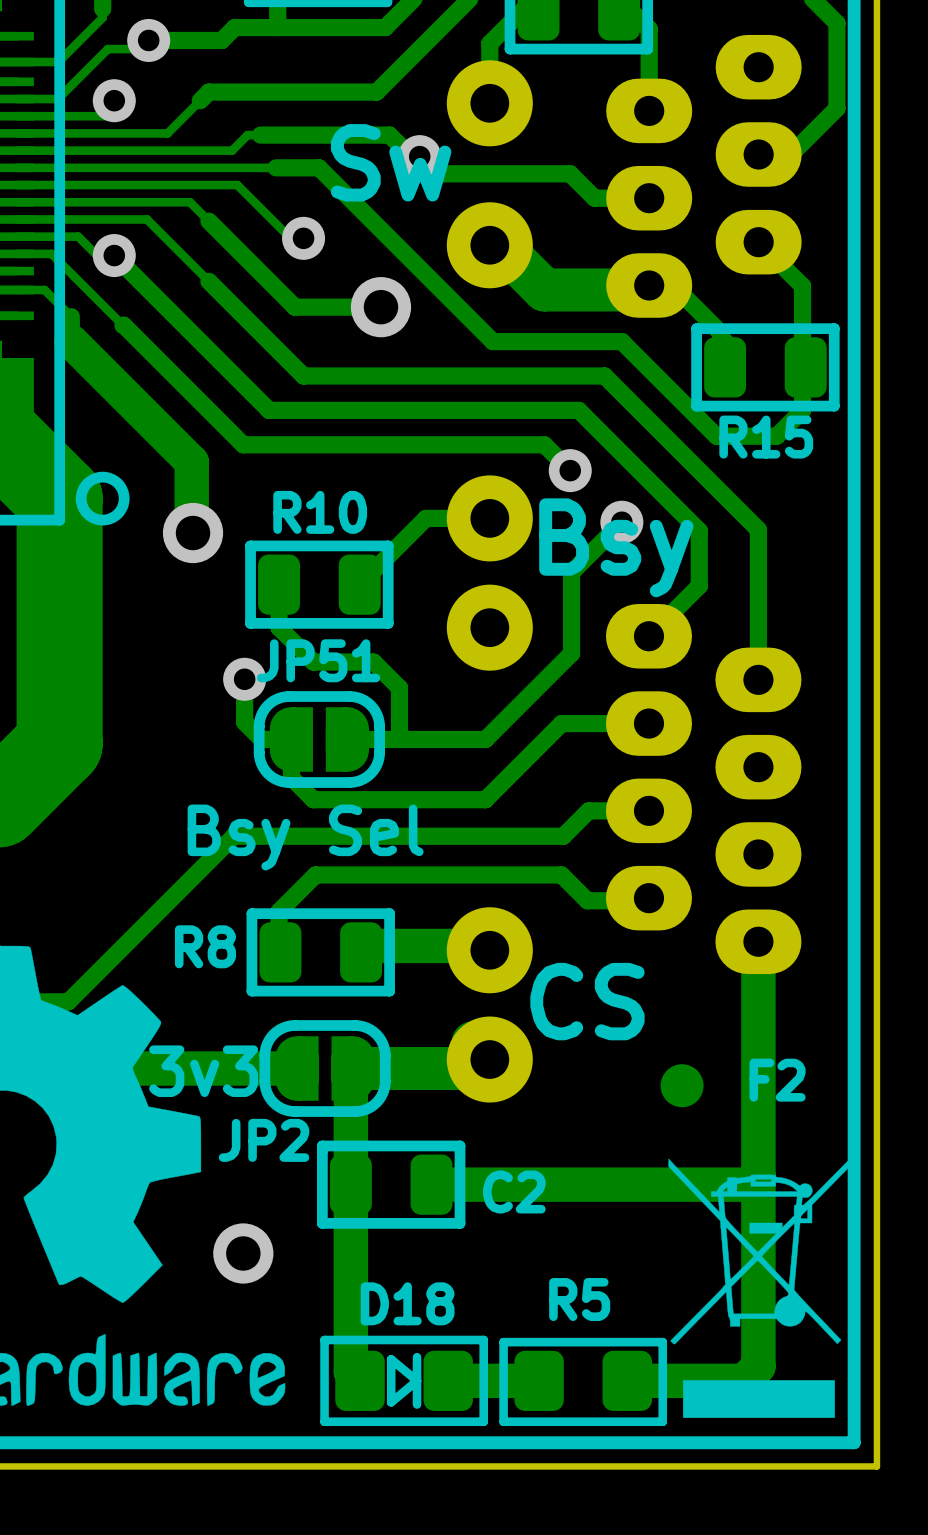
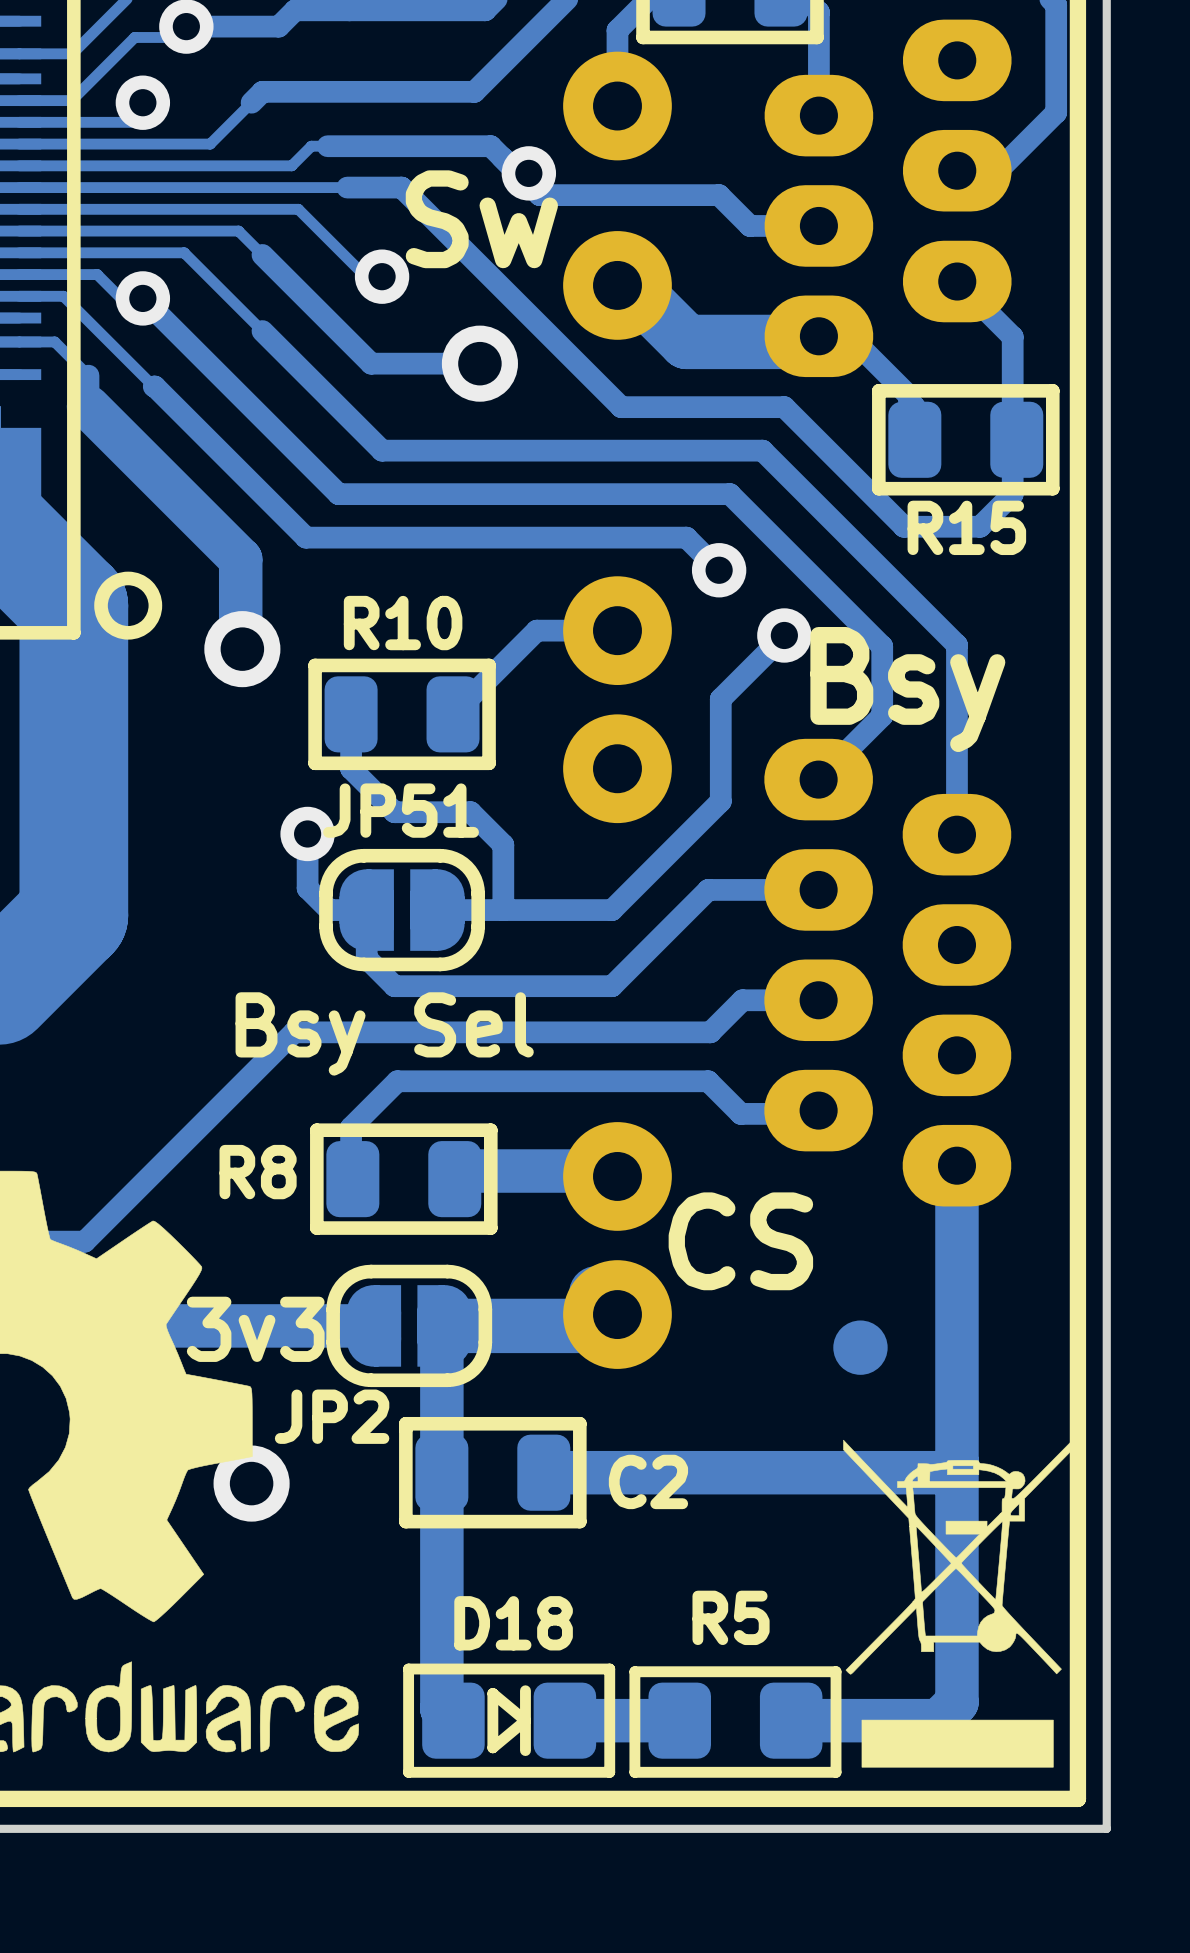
text position: Sw (391, 162) -> Sw (481, 219)
text position: Bsy (616, 547) -> Bsy (907, 689)
F2 name: F2 (777, 1080) -> none
via position: (243, 1253) -> (251, 1483)

